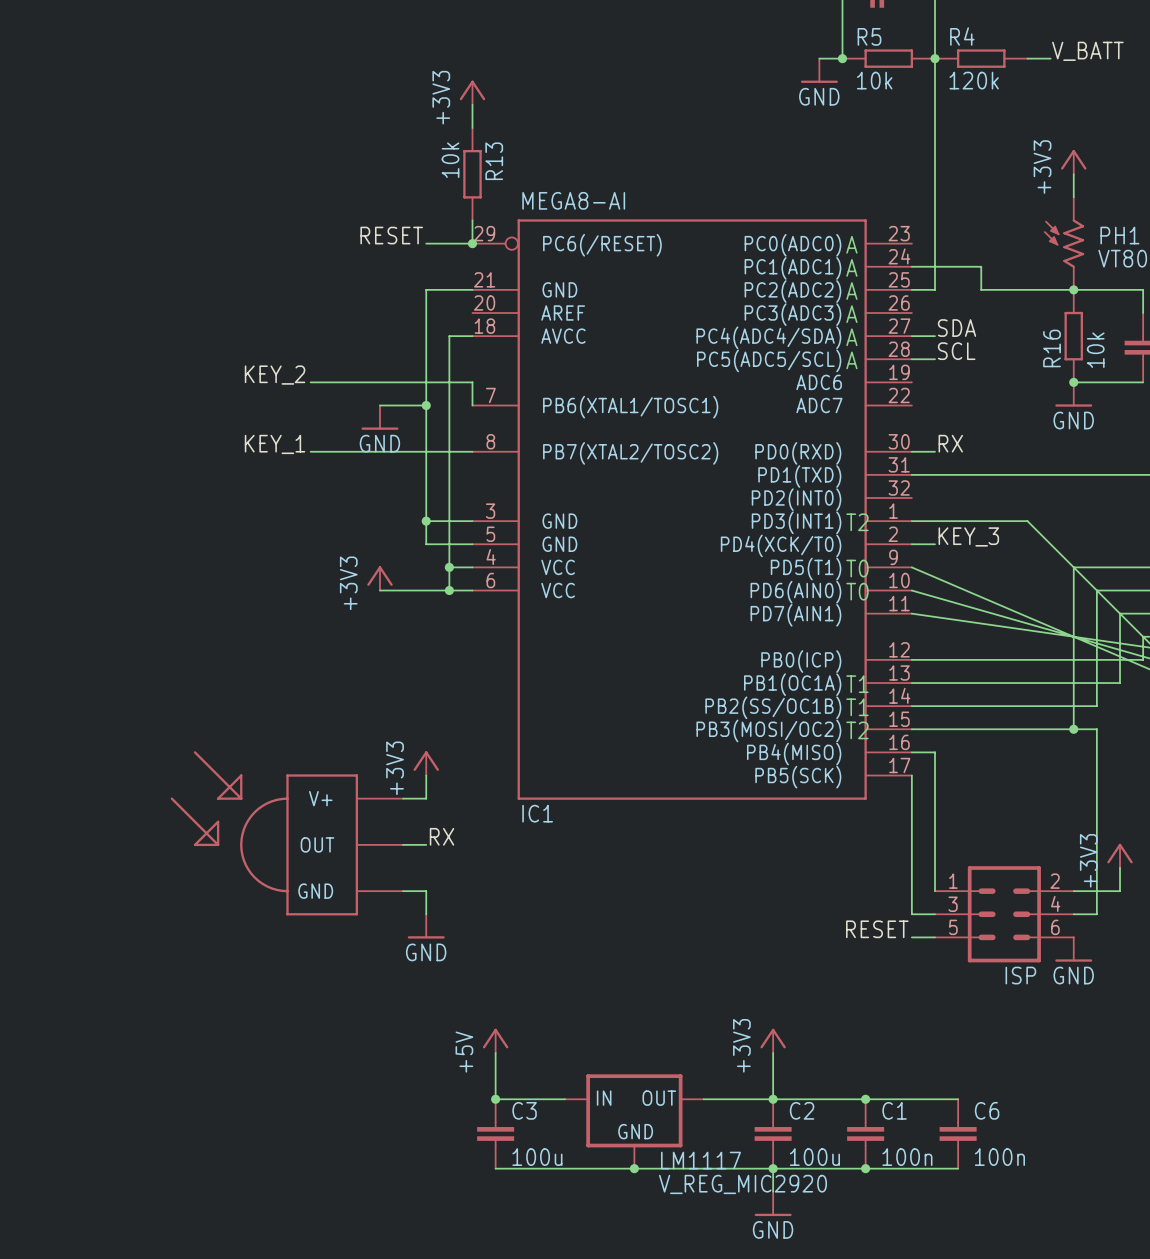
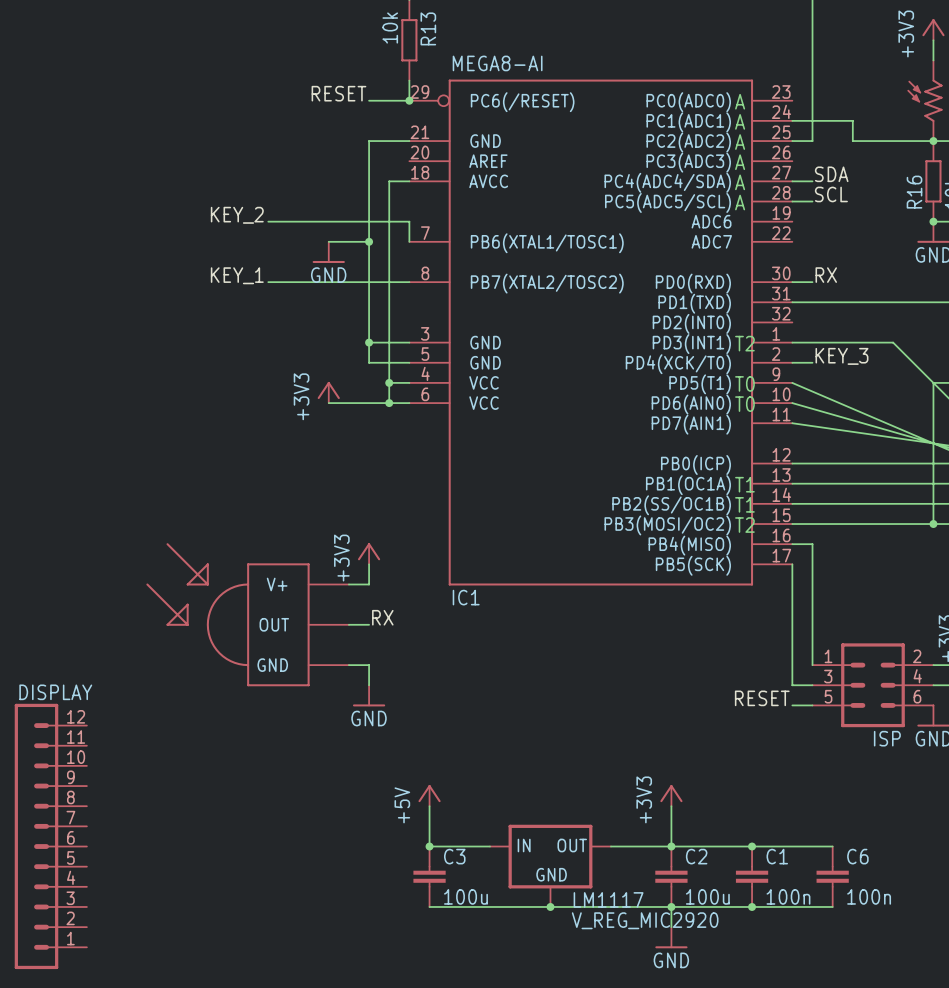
DISPLAY: none -> (50, 836)

